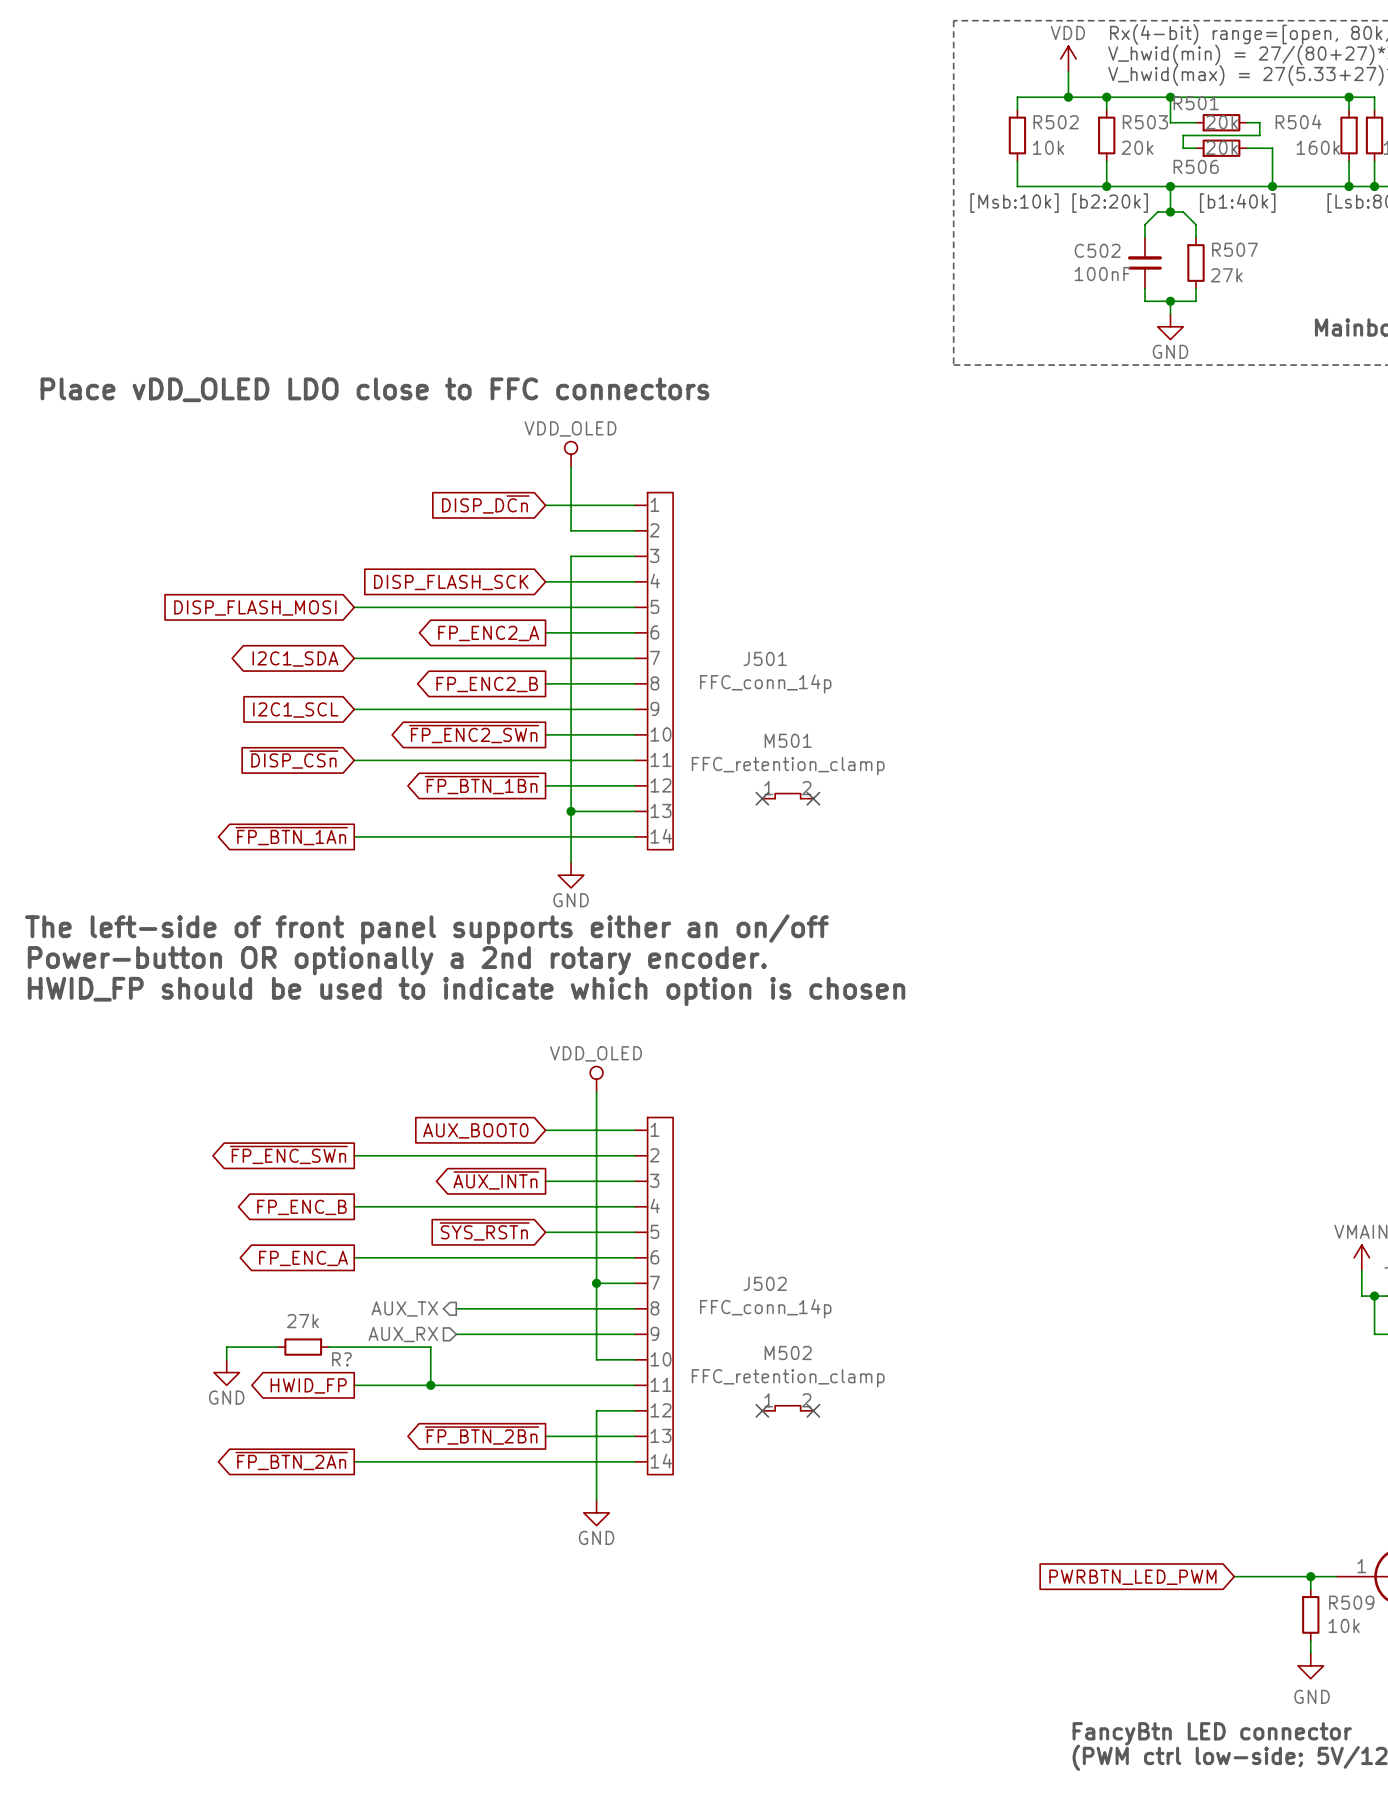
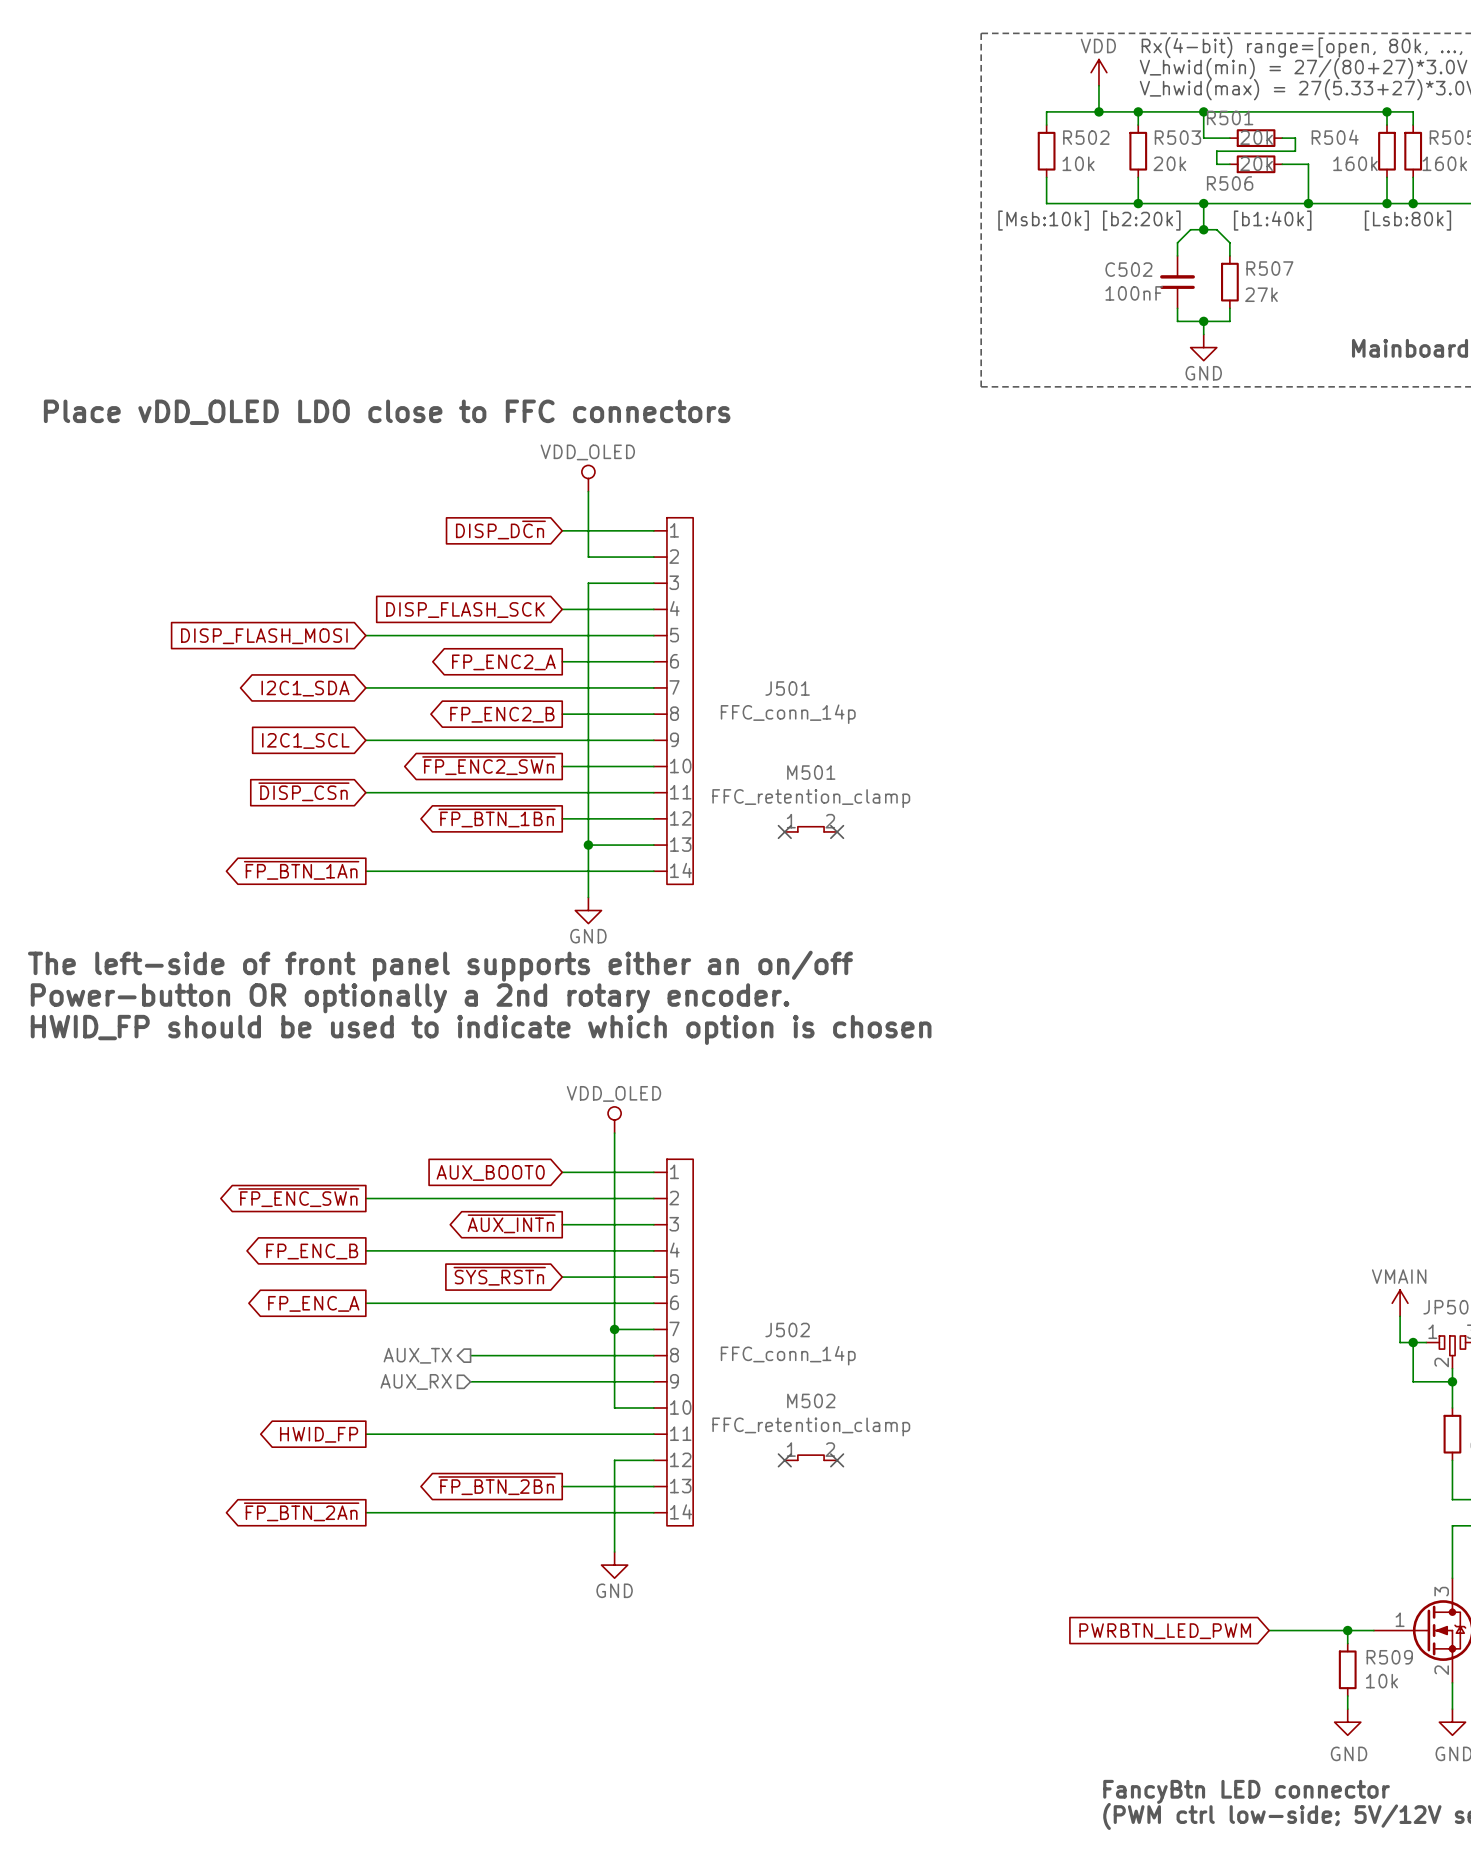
wire: (277, 1347) (226, 1347) (226, 1359) -> none
R?: 27k (303, 1347) -> none
wire: (328, 1347) (430, 1347) (430, 1385) -> none
power symbol: GND (226, 1372) -> none
junction: (430, 1385) -> none

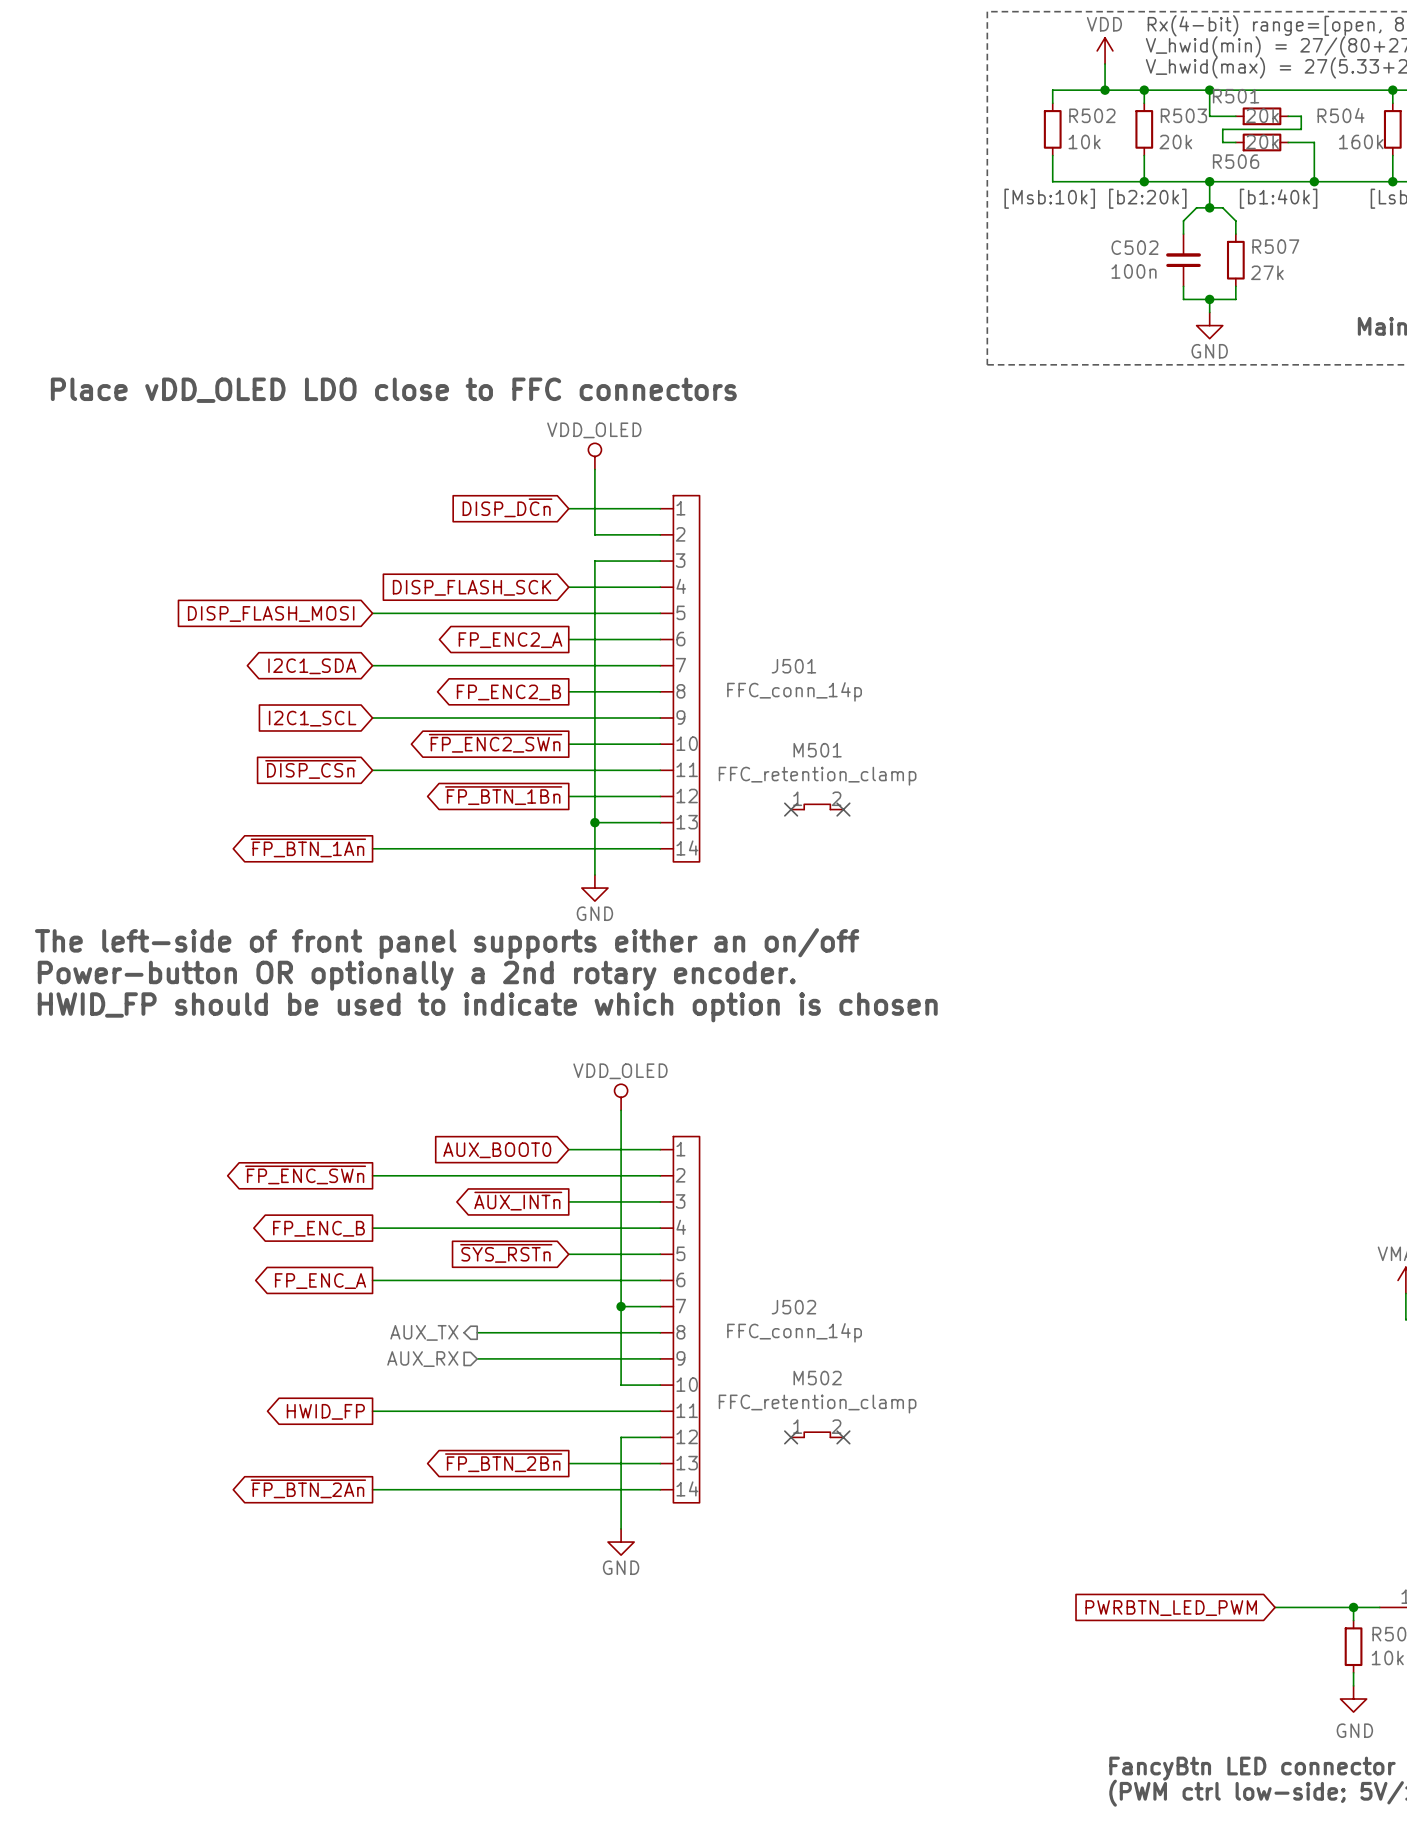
C502 value: 100nF (1134, 293) -> 100n (1134, 271)

